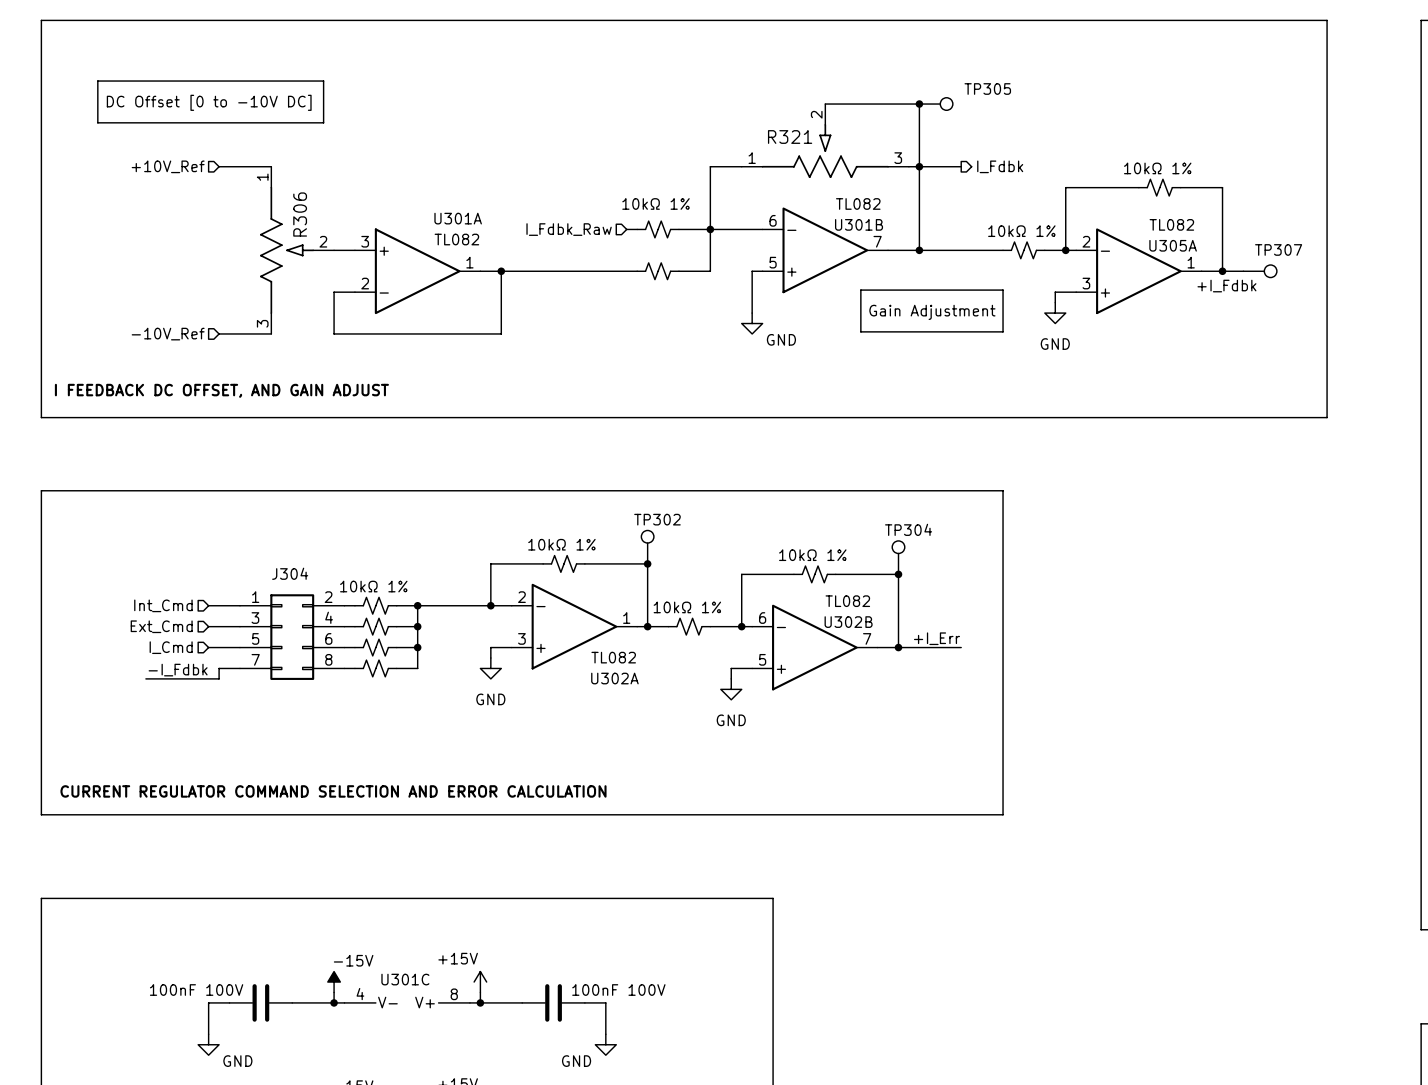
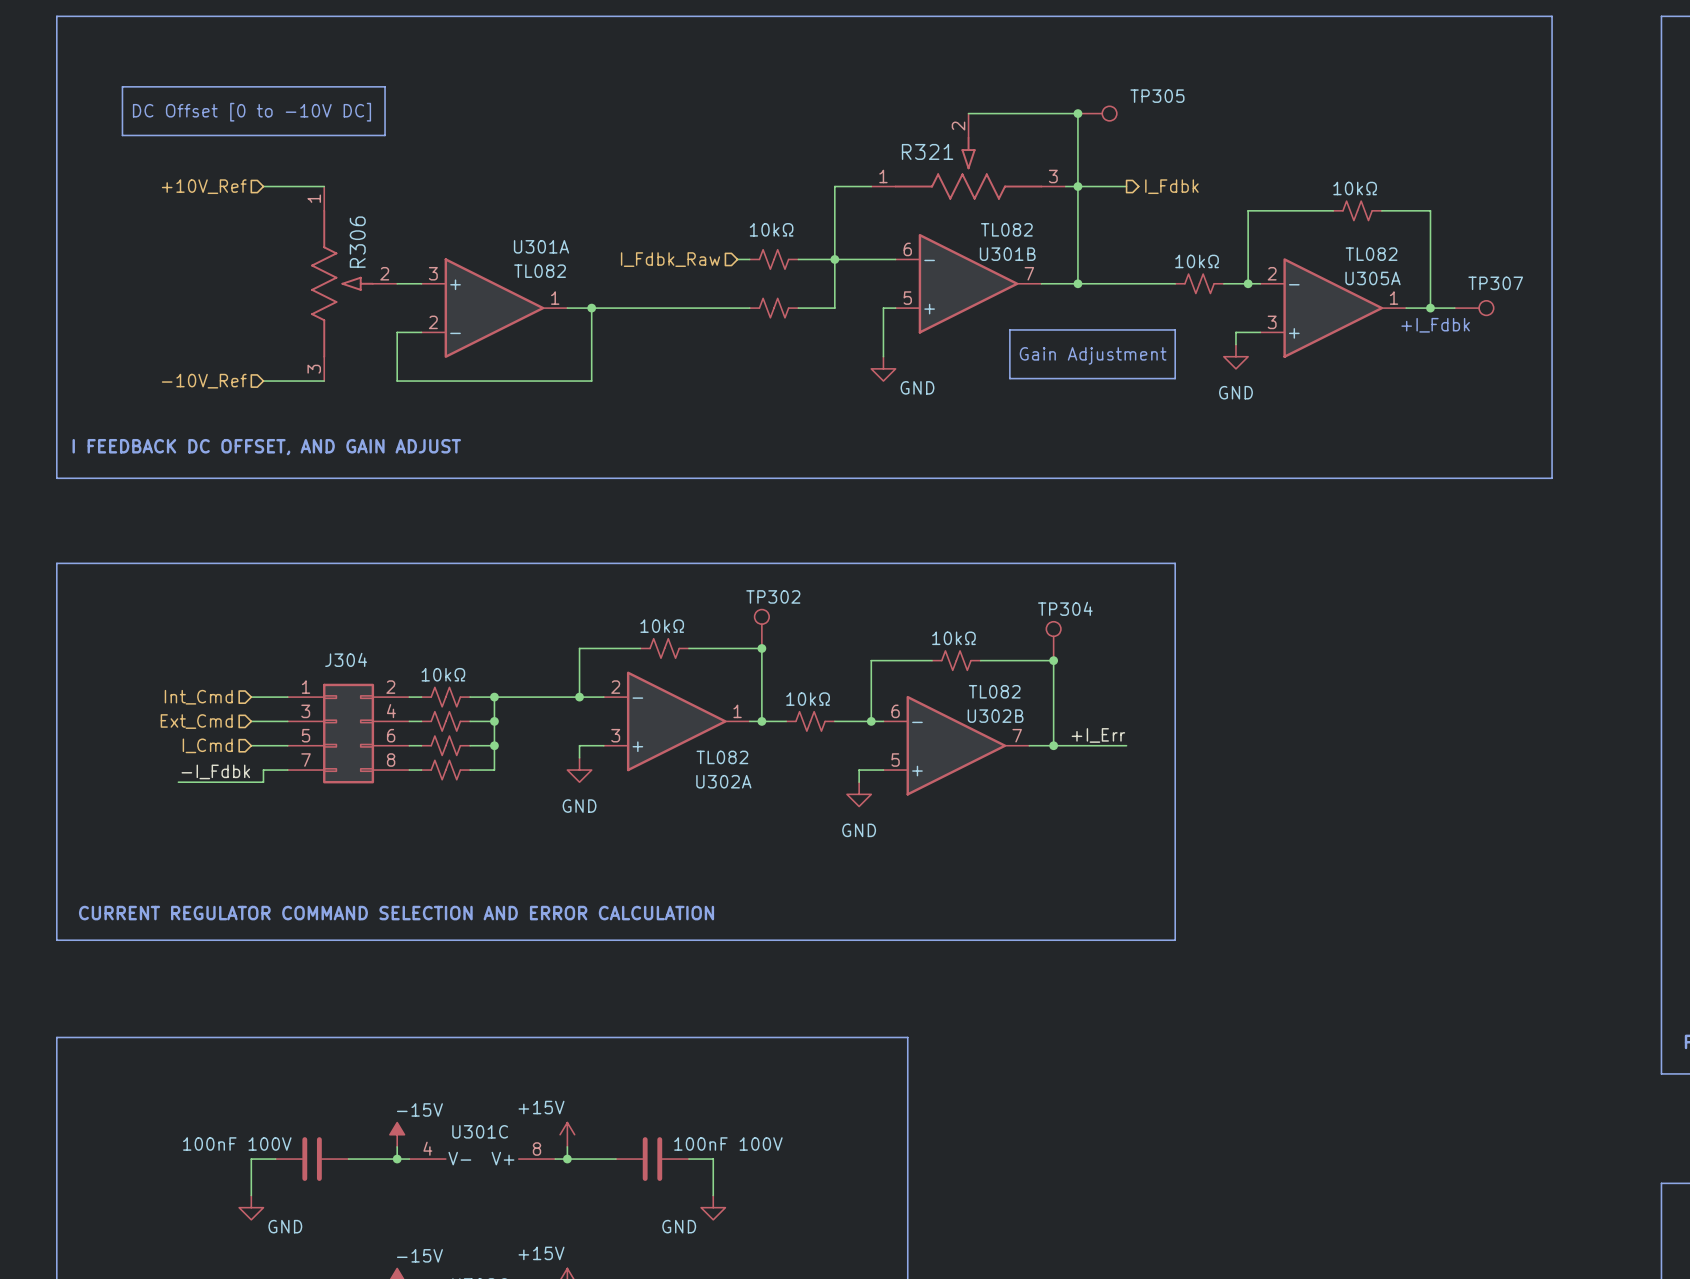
part value: 10kΩ 1% (1157, 168) -> 10kΩ (1355, 188)
part value: 10kΩ 1% (656, 203) -> 10kΩ (771, 229)
part value: 10kΩ 1% (1021, 231) -> 10kΩ (1197, 261)
part value: 10kΩ 1% (561, 544) -> 10kΩ (662, 626)
part value: 10kΩ 1% (812, 555) -> 10kΩ (953, 638)
part value: 10kΩ 1% (373, 586) -> 10kΩ (443, 674)
part value: 10kΩ 1% (687, 607) -> 10kΩ (808, 699)

